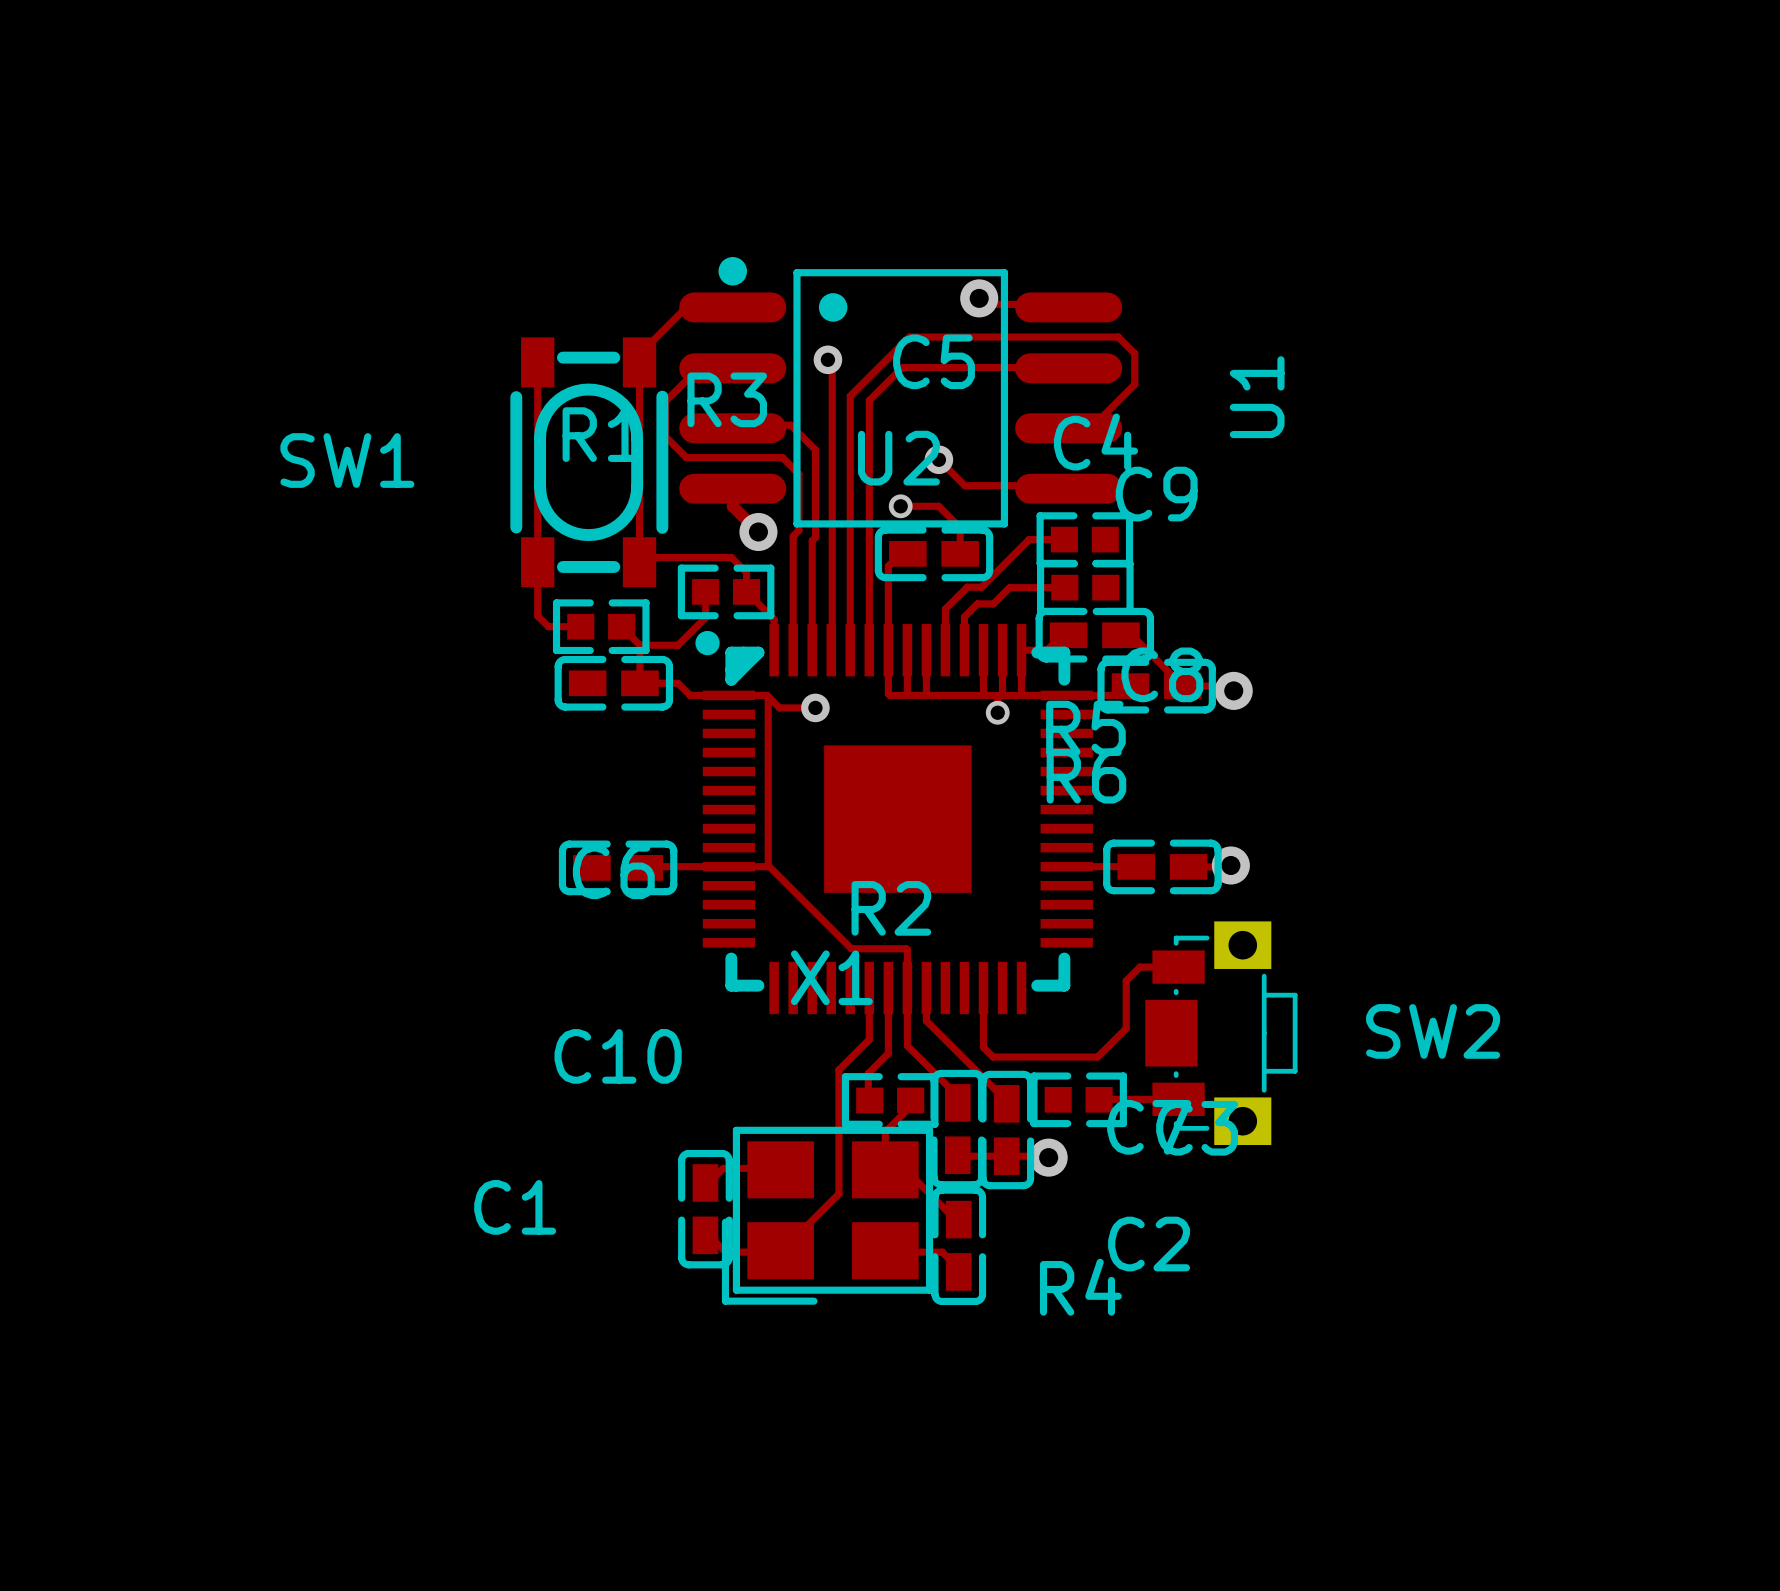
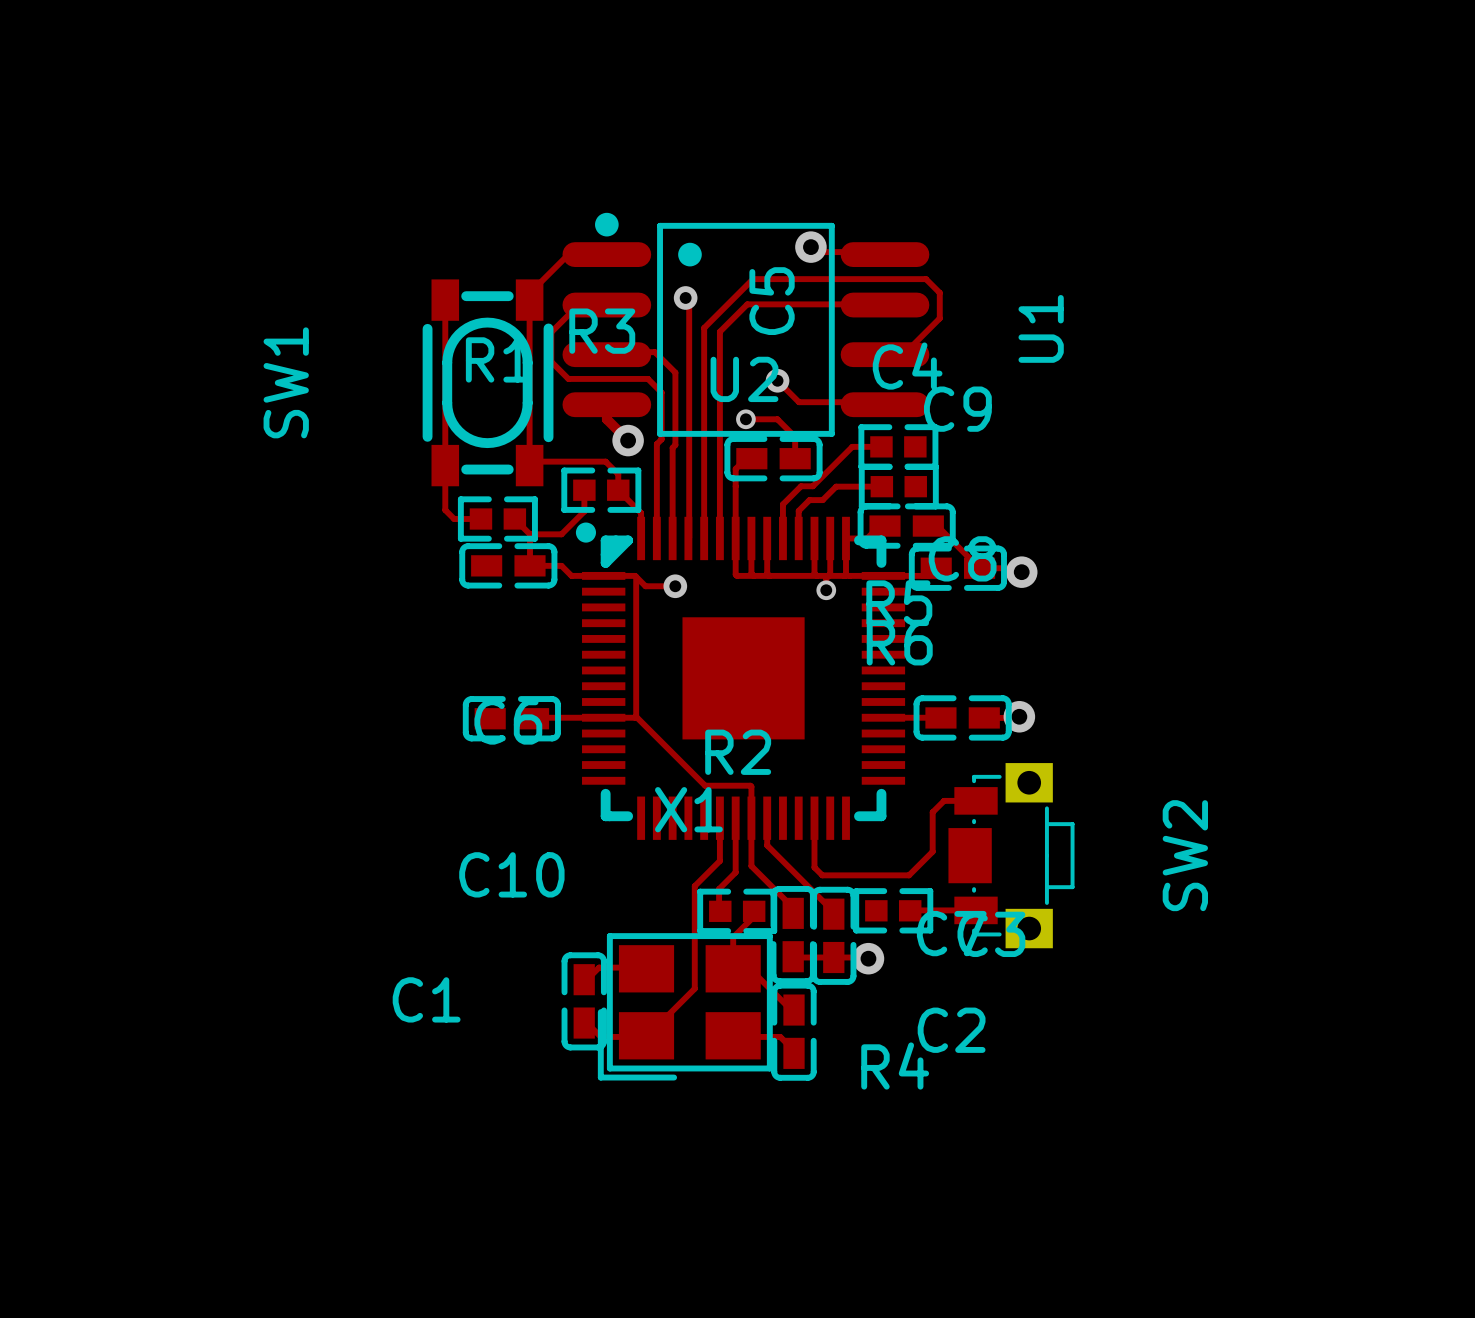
C5 name rotation: 0° (934, 361) -> 90° counterclockwise (772, 301)
SW1 name rotation: 0° (347, 460) -> 90° counterclockwise (286, 382)
SW2 name rotation: 0° (1433, 1031) -> 90° counterclockwise (1185, 855)

